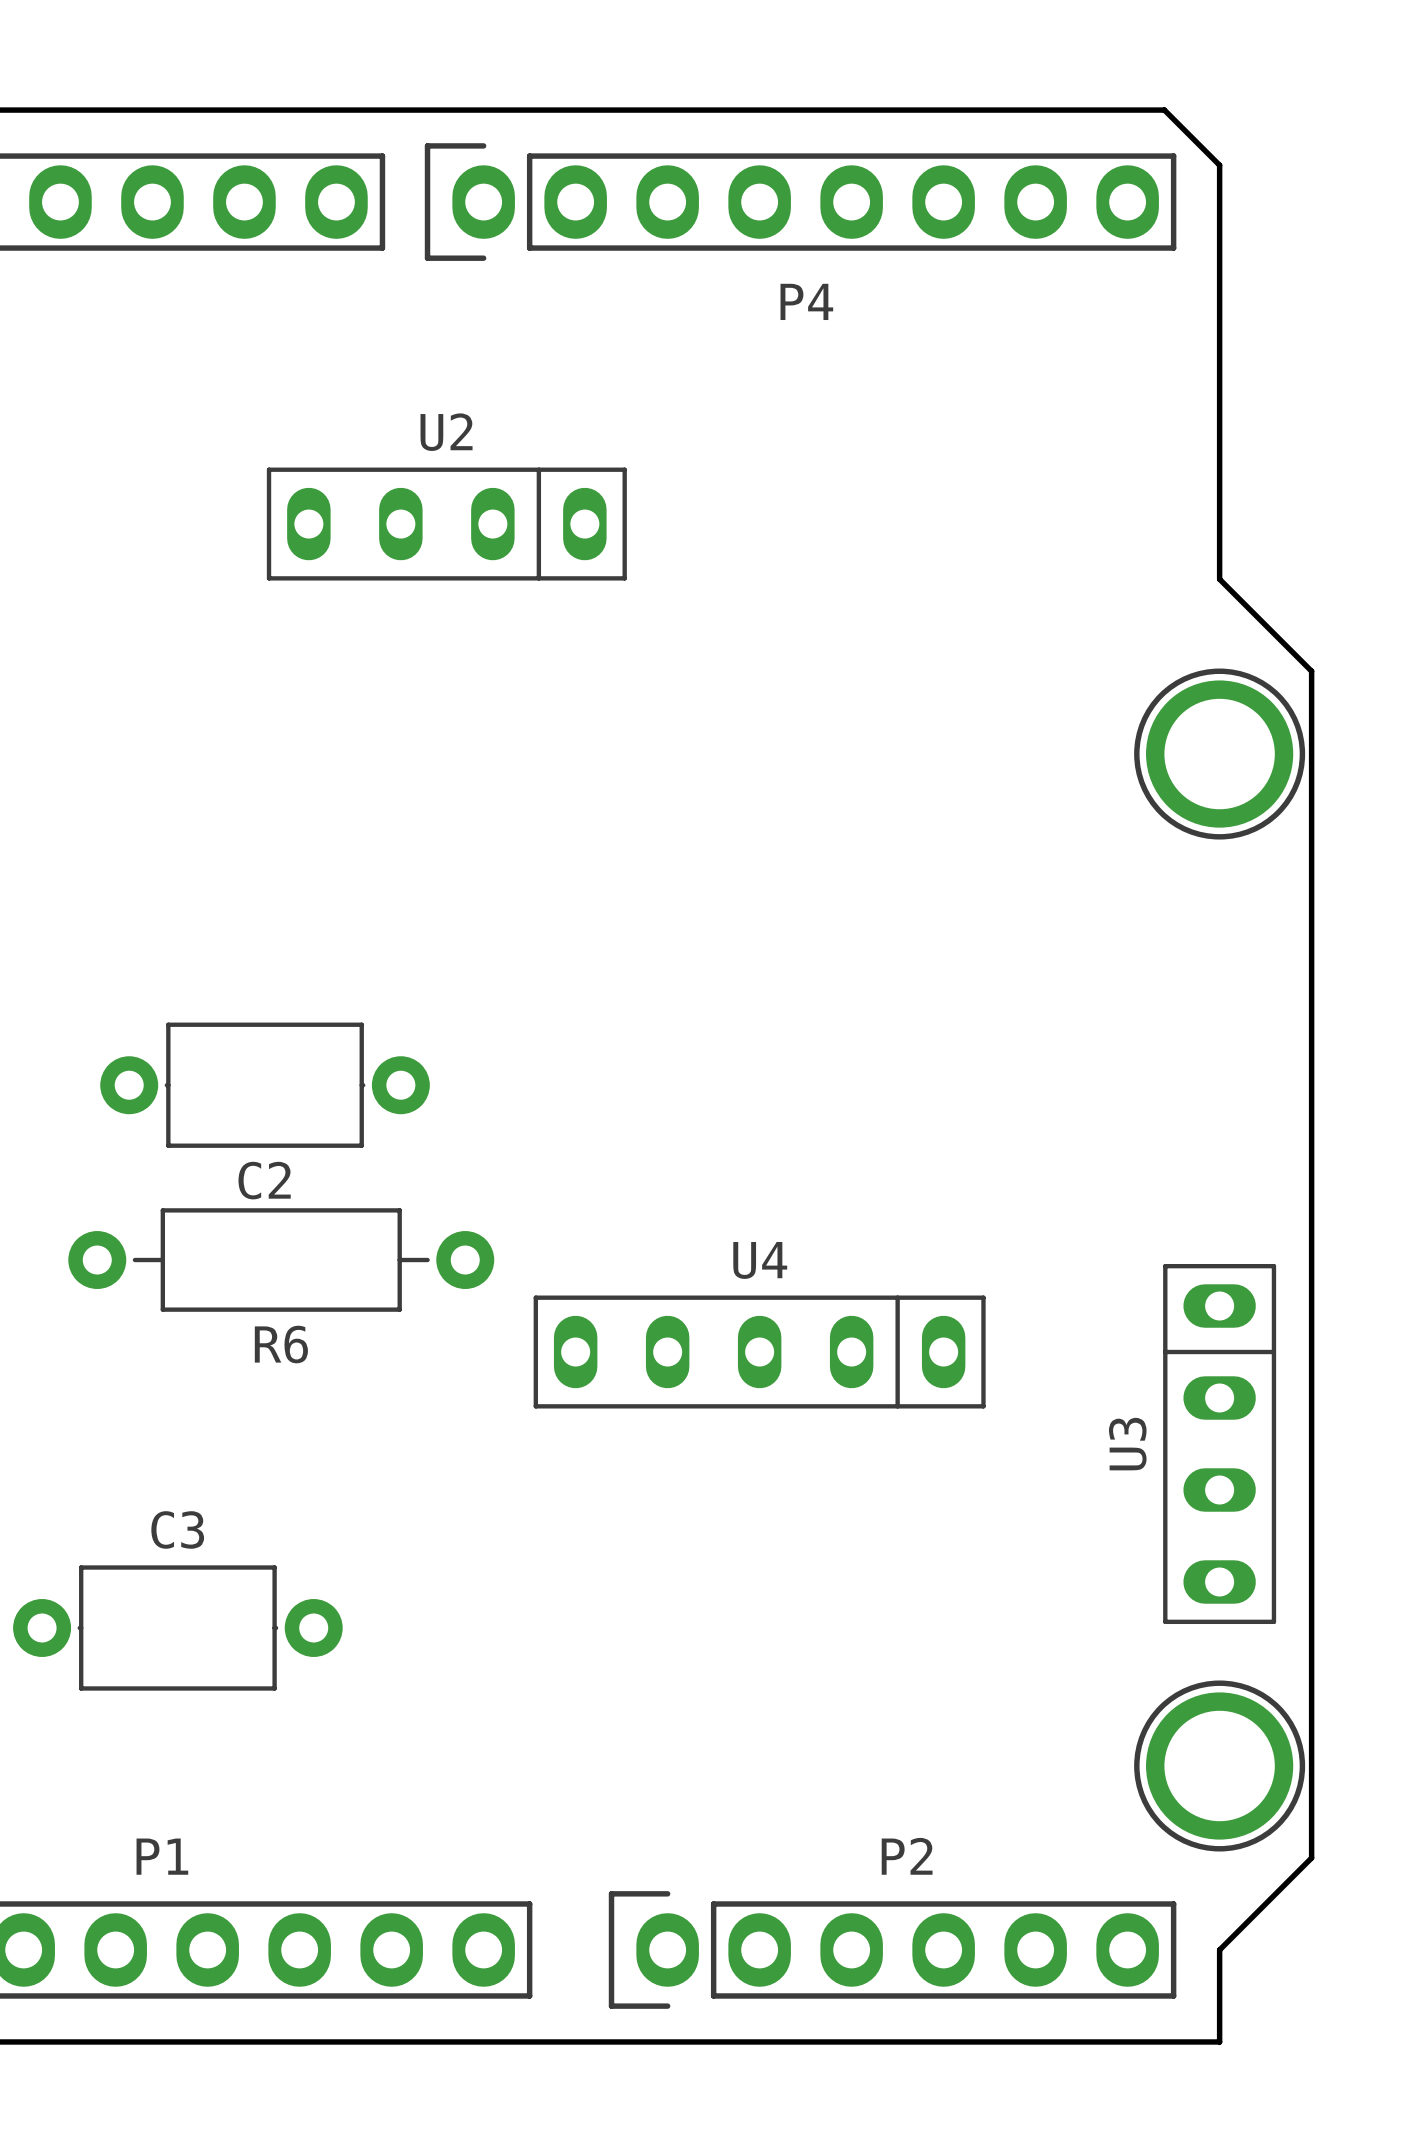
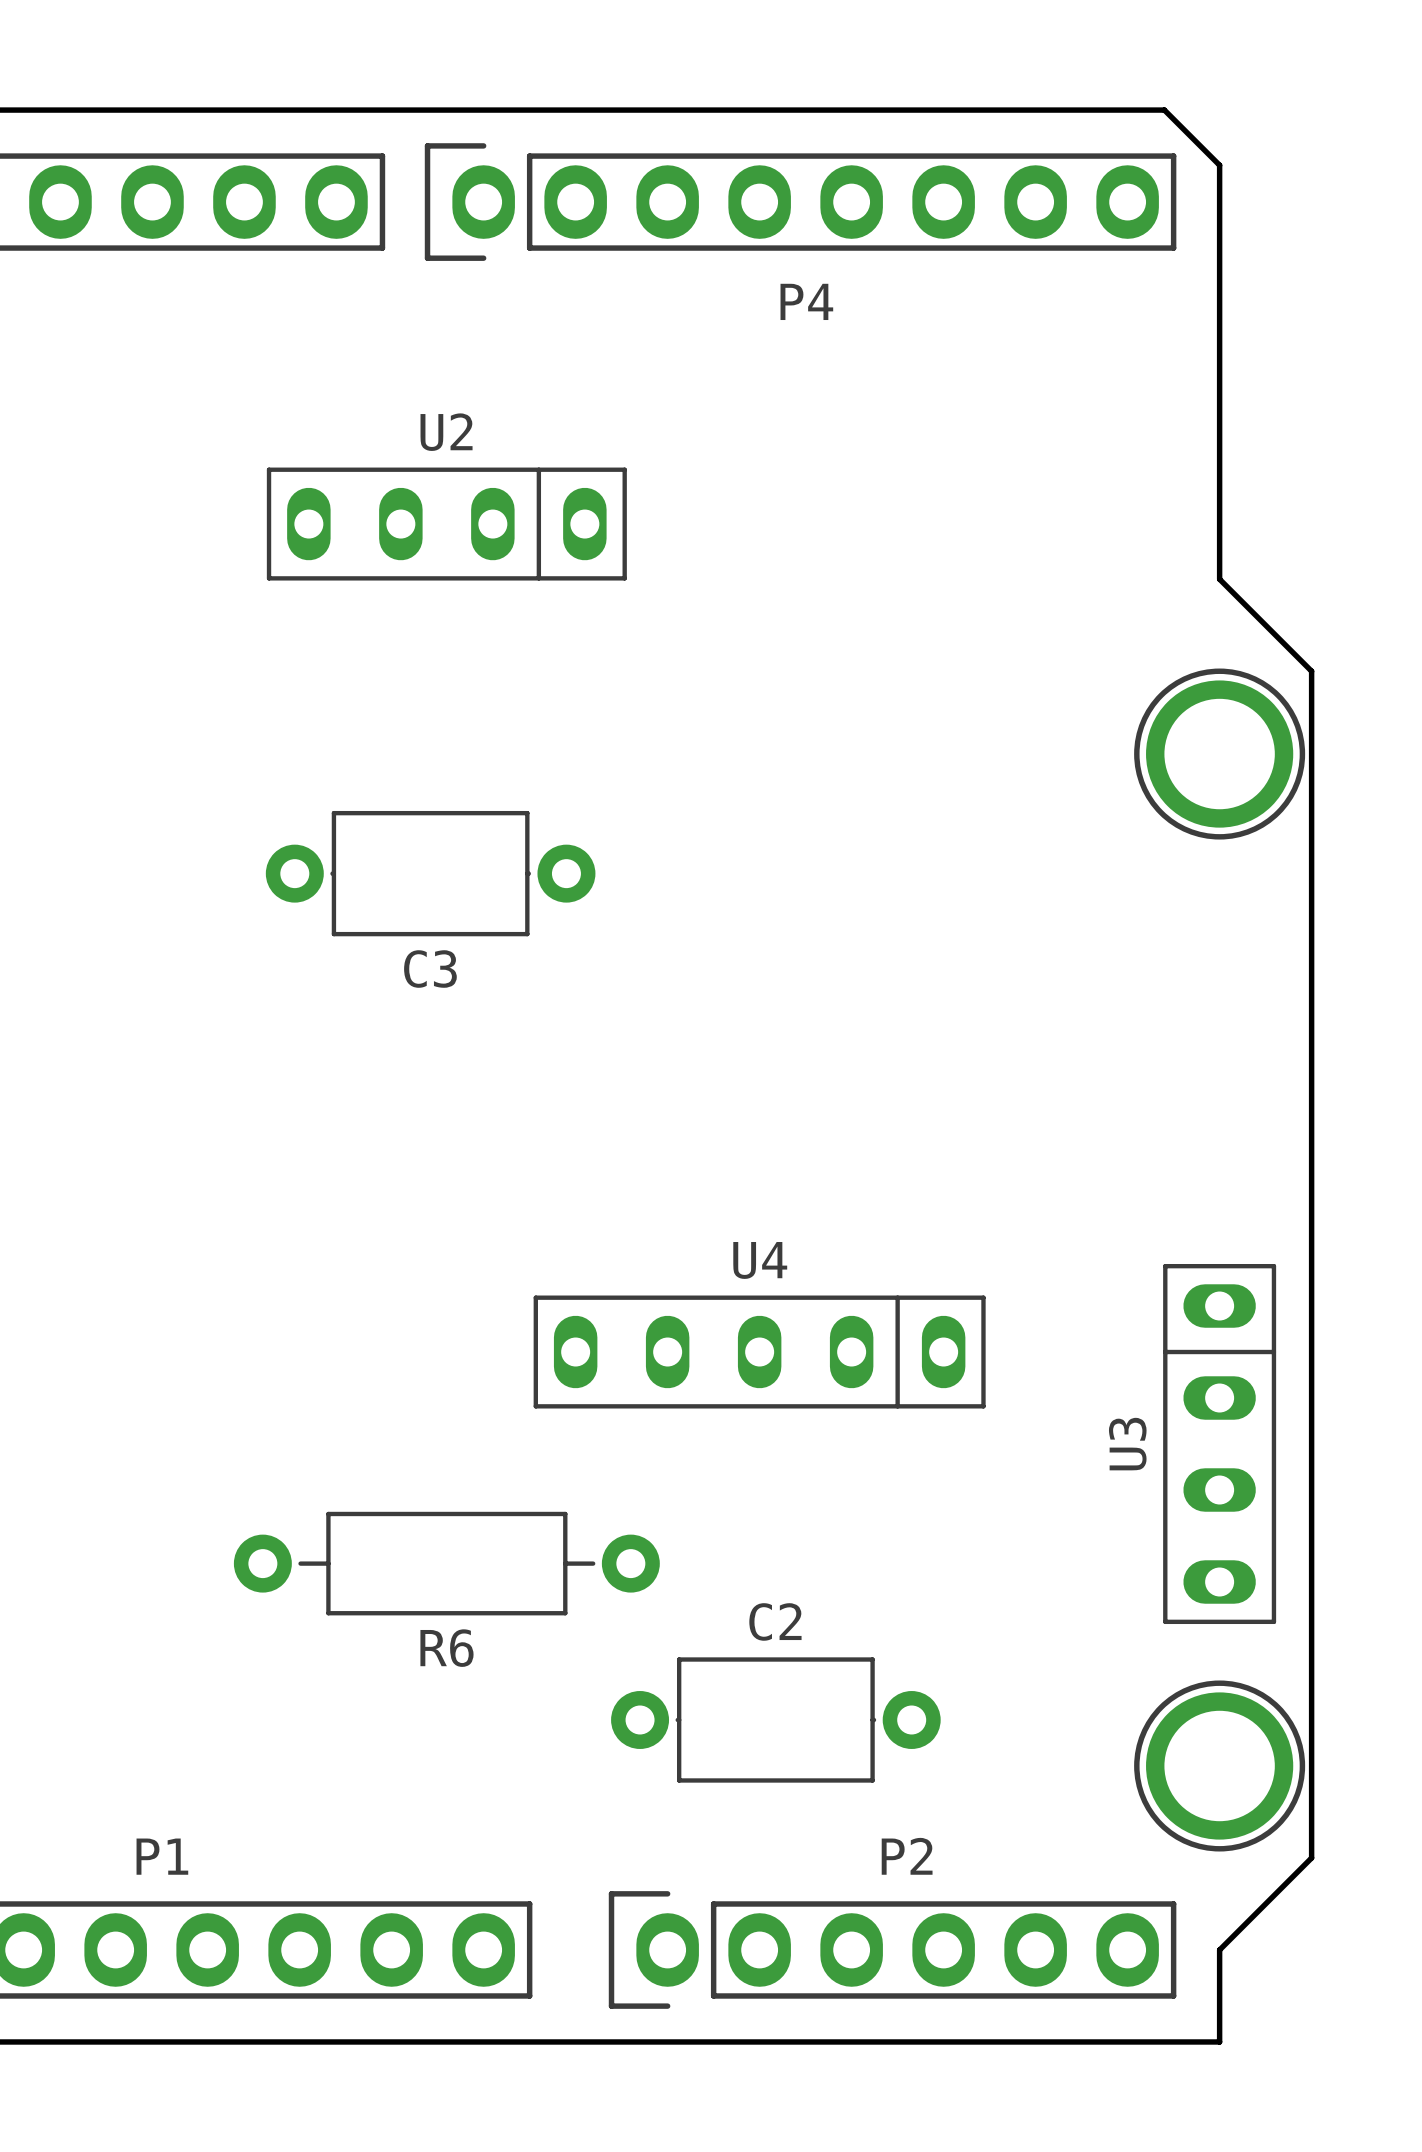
C2 position: (265, 1085) -> (775, 1719)
C2 name position: C2 (264, 1180) -> C2 (775, 1621)
R6 position: (281, 1260) -> (446, 1563)
C3 name position: C3 (177, 1529) -> C3 (430, 969)
C3 position: (177, 1628) -> (430, 873)

